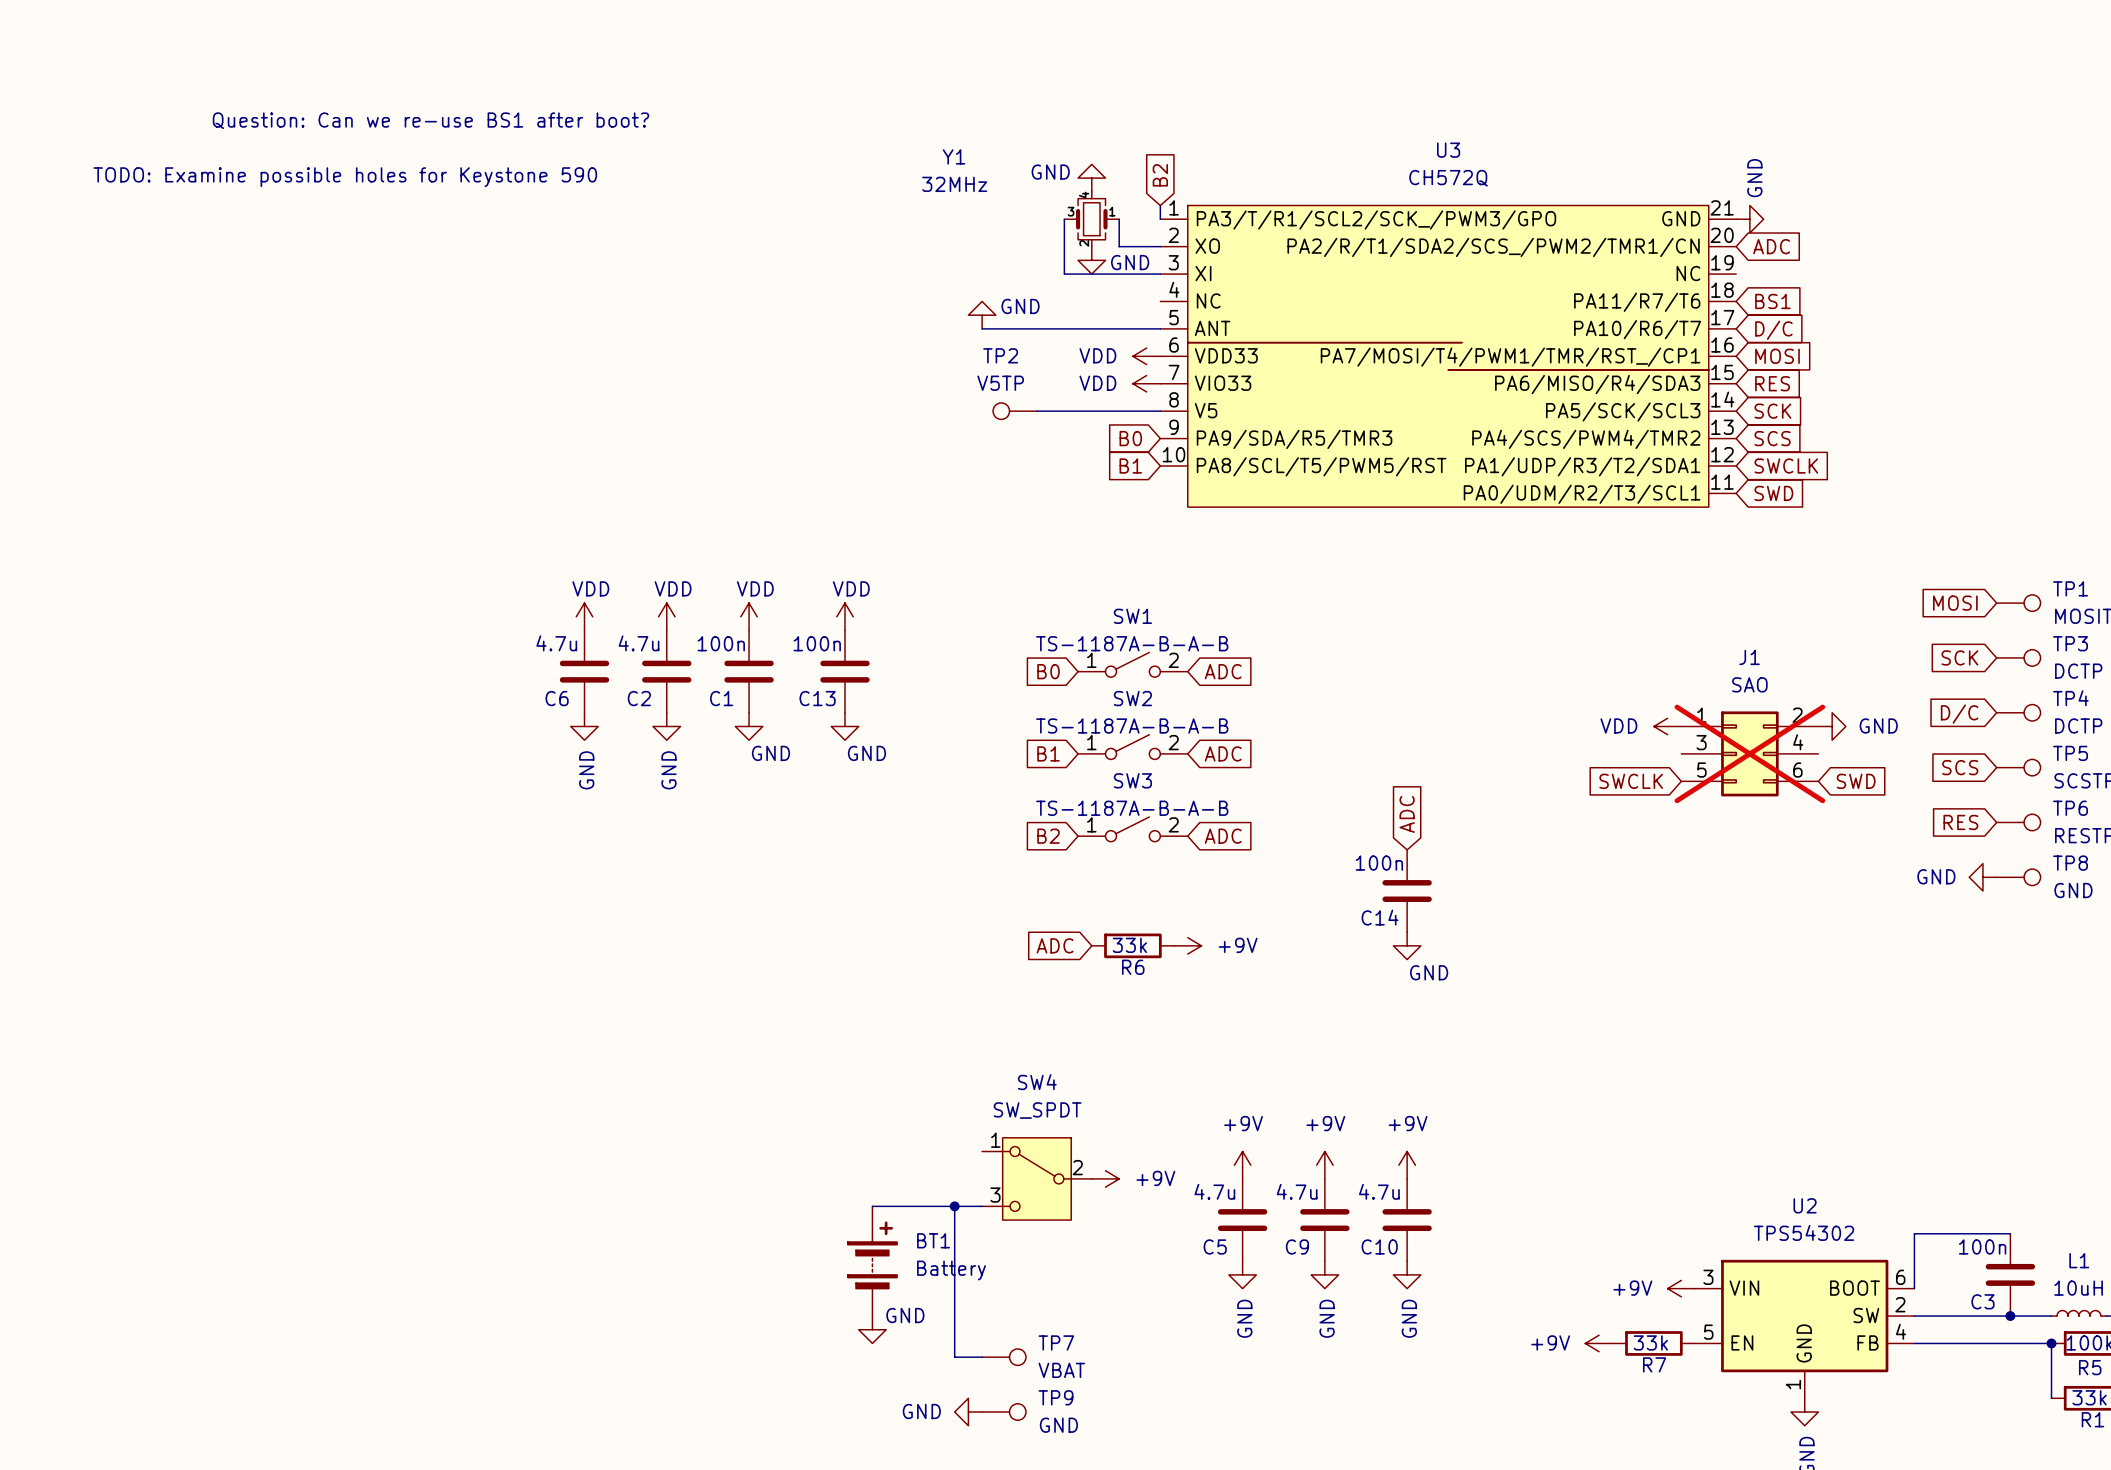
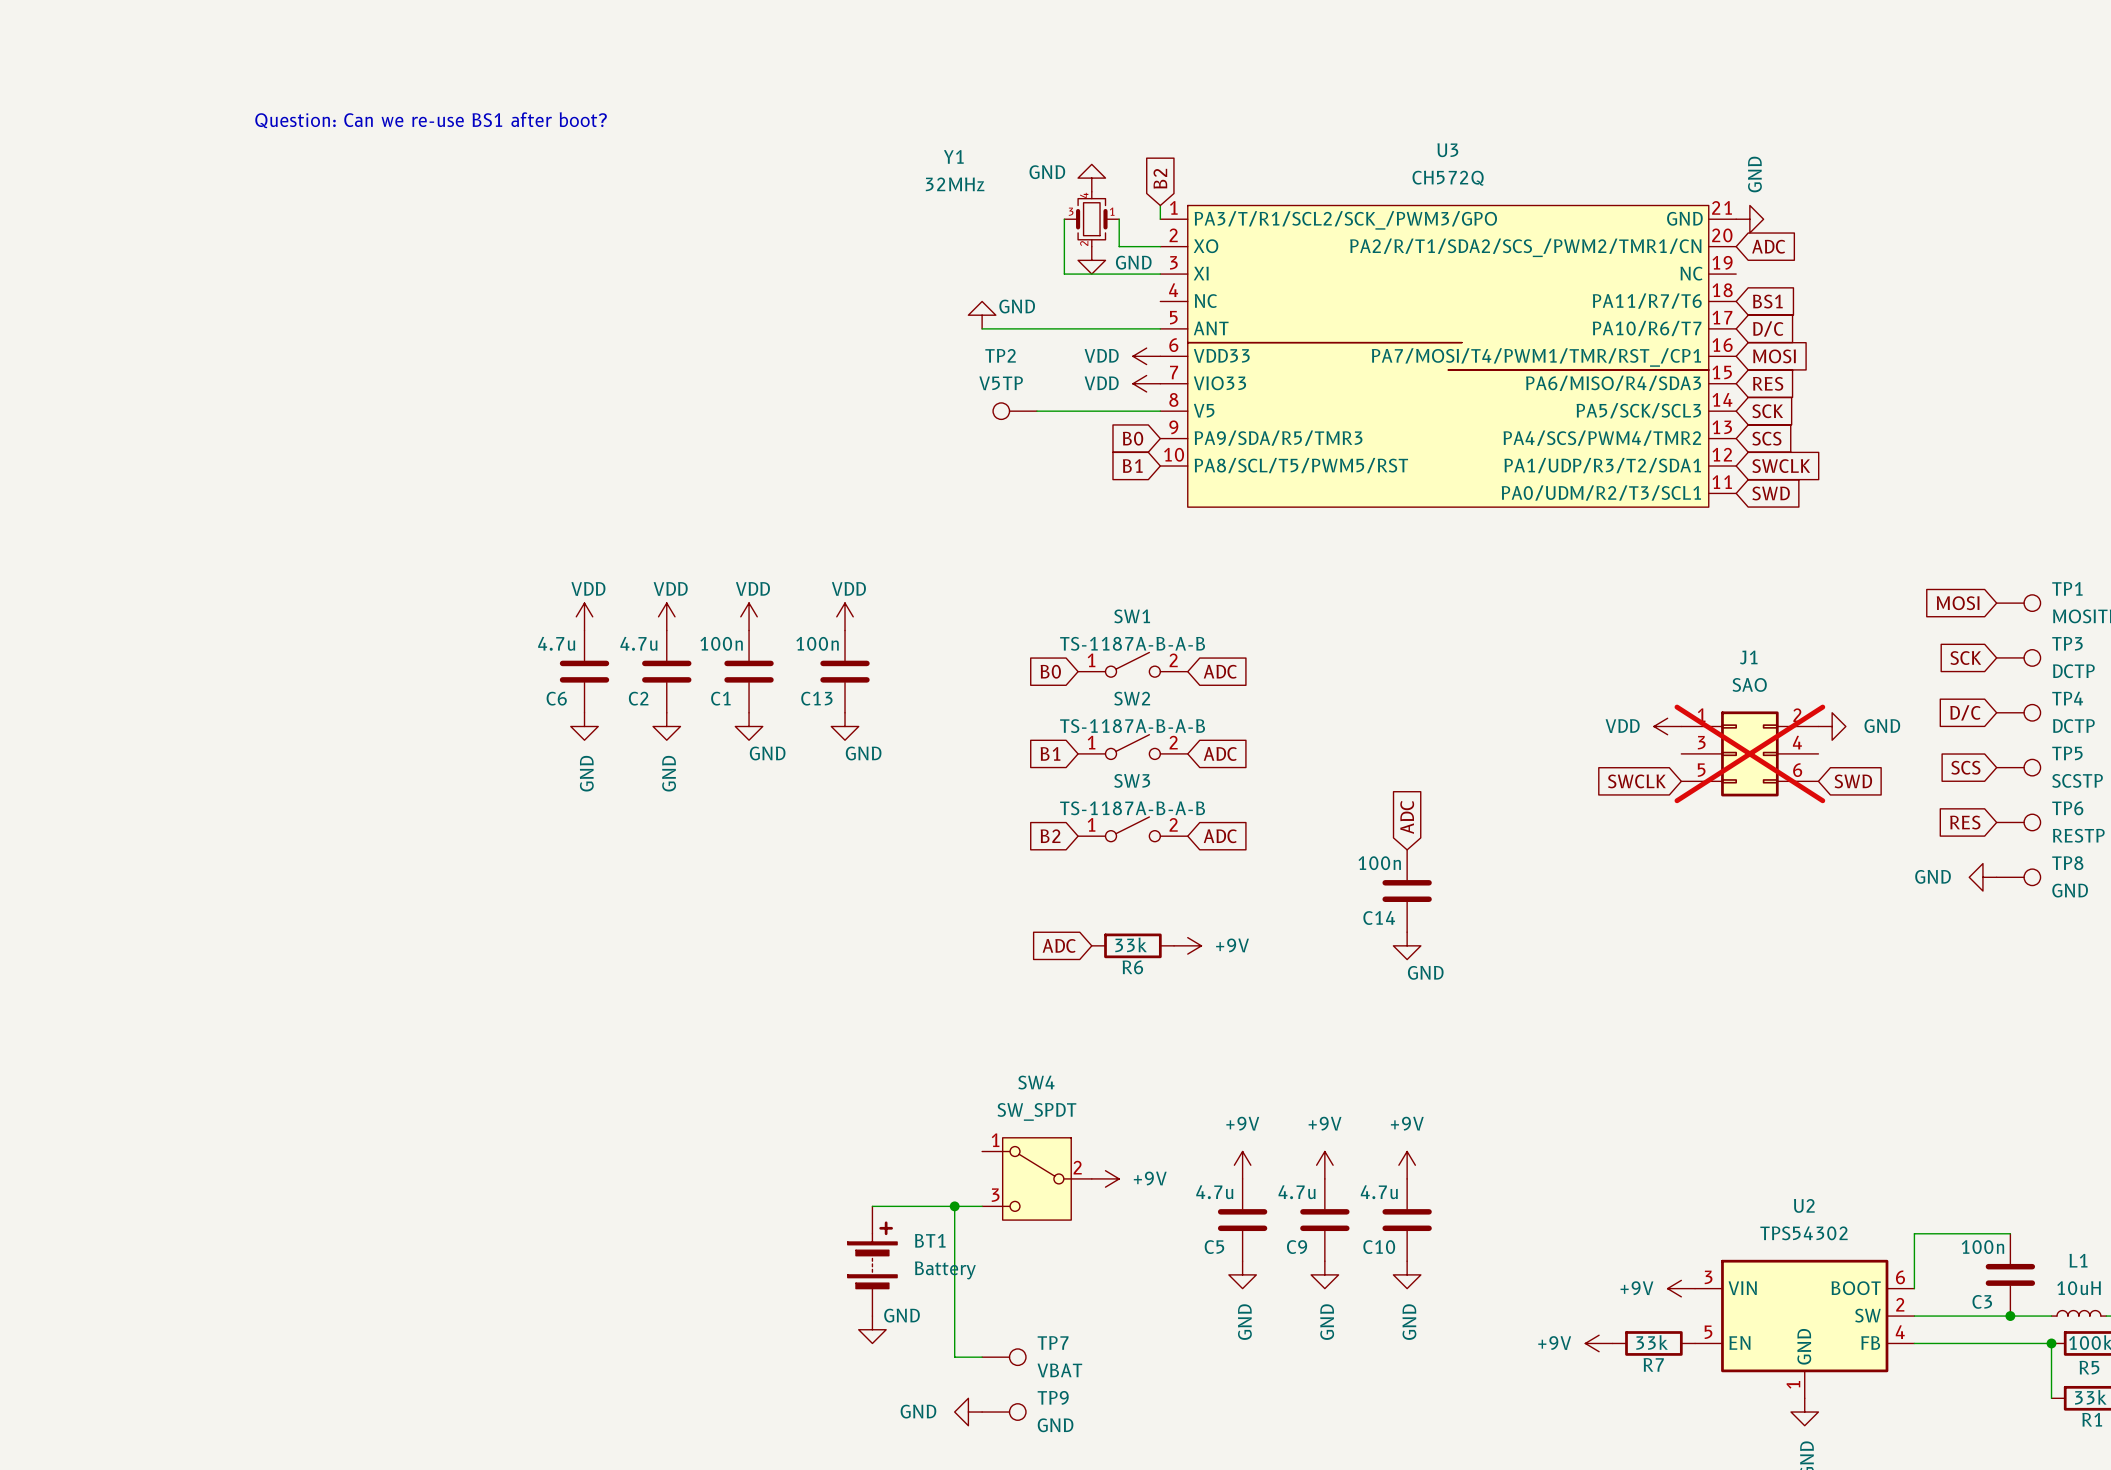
text: TODO: Examine possible holes for Keystone 590 (345, 177) -> none

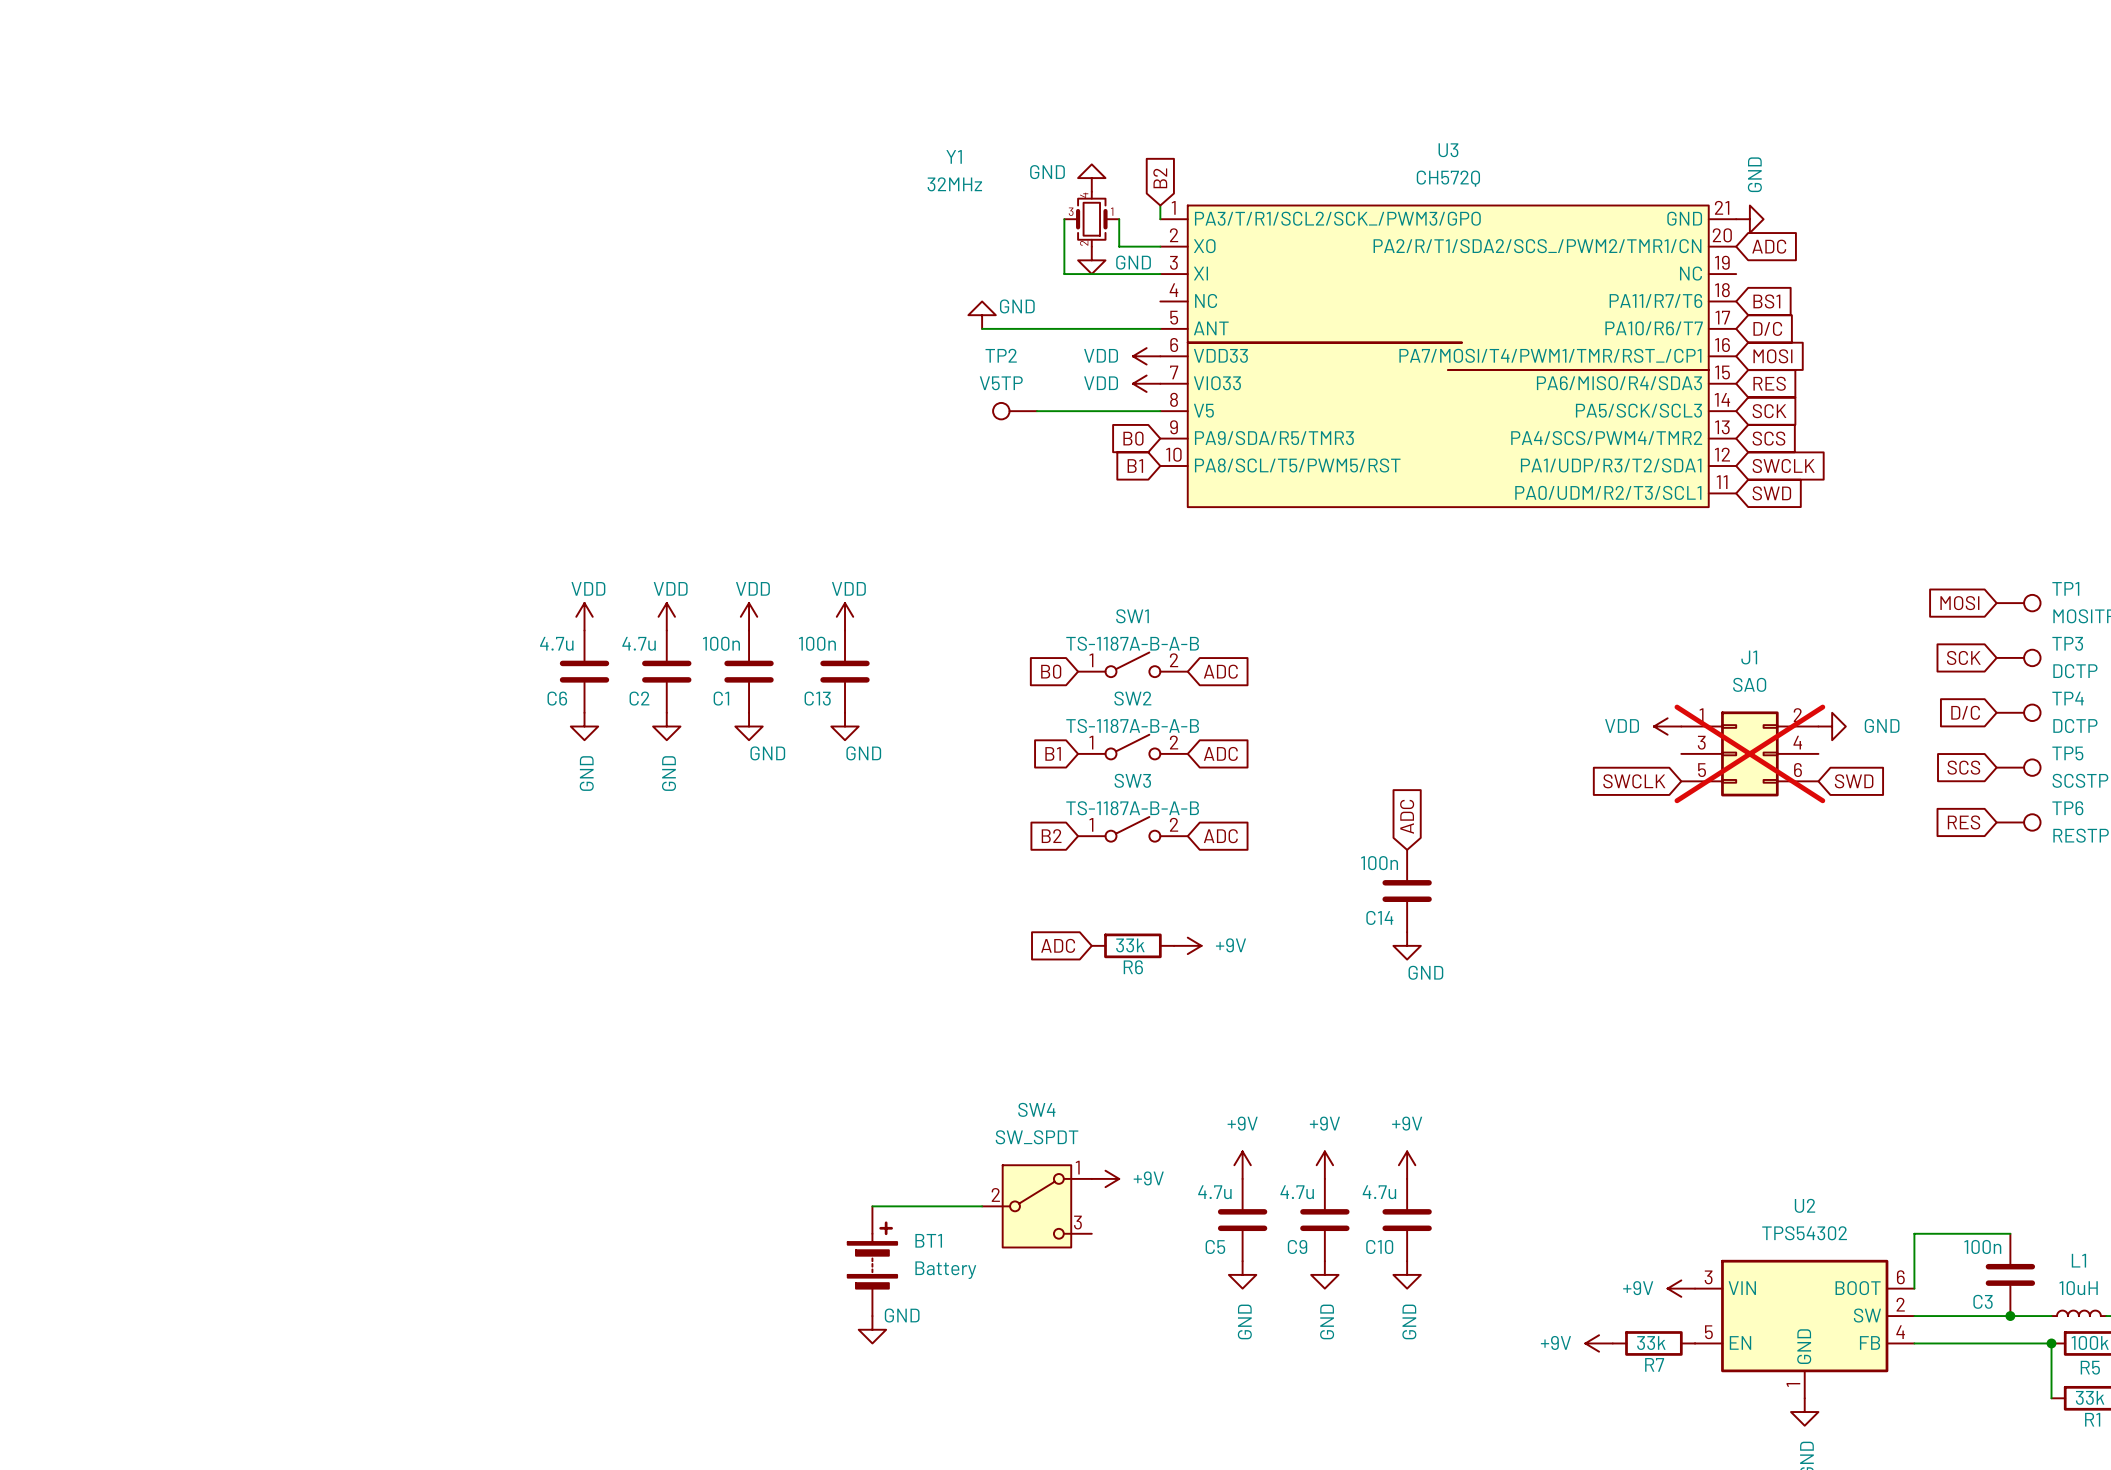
text: Question: Can we re-use BS1 after boot? (431, 120) -> none
power symbol: GND (1982, 877) -> none
TP8: GND (2018, 877) -> none
SW4 flip: as is (1036, 1178) -> left-right (1036, 1206)
wire: (954, 1206) (954, 1357) (982, 1357) -> none
junction: (954, 1206) -> none
TP7: VBAT (1004, 1357) -> none
power symbol: GND (968, 1412) -> none
TP9: GND (1004, 1412) -> none

